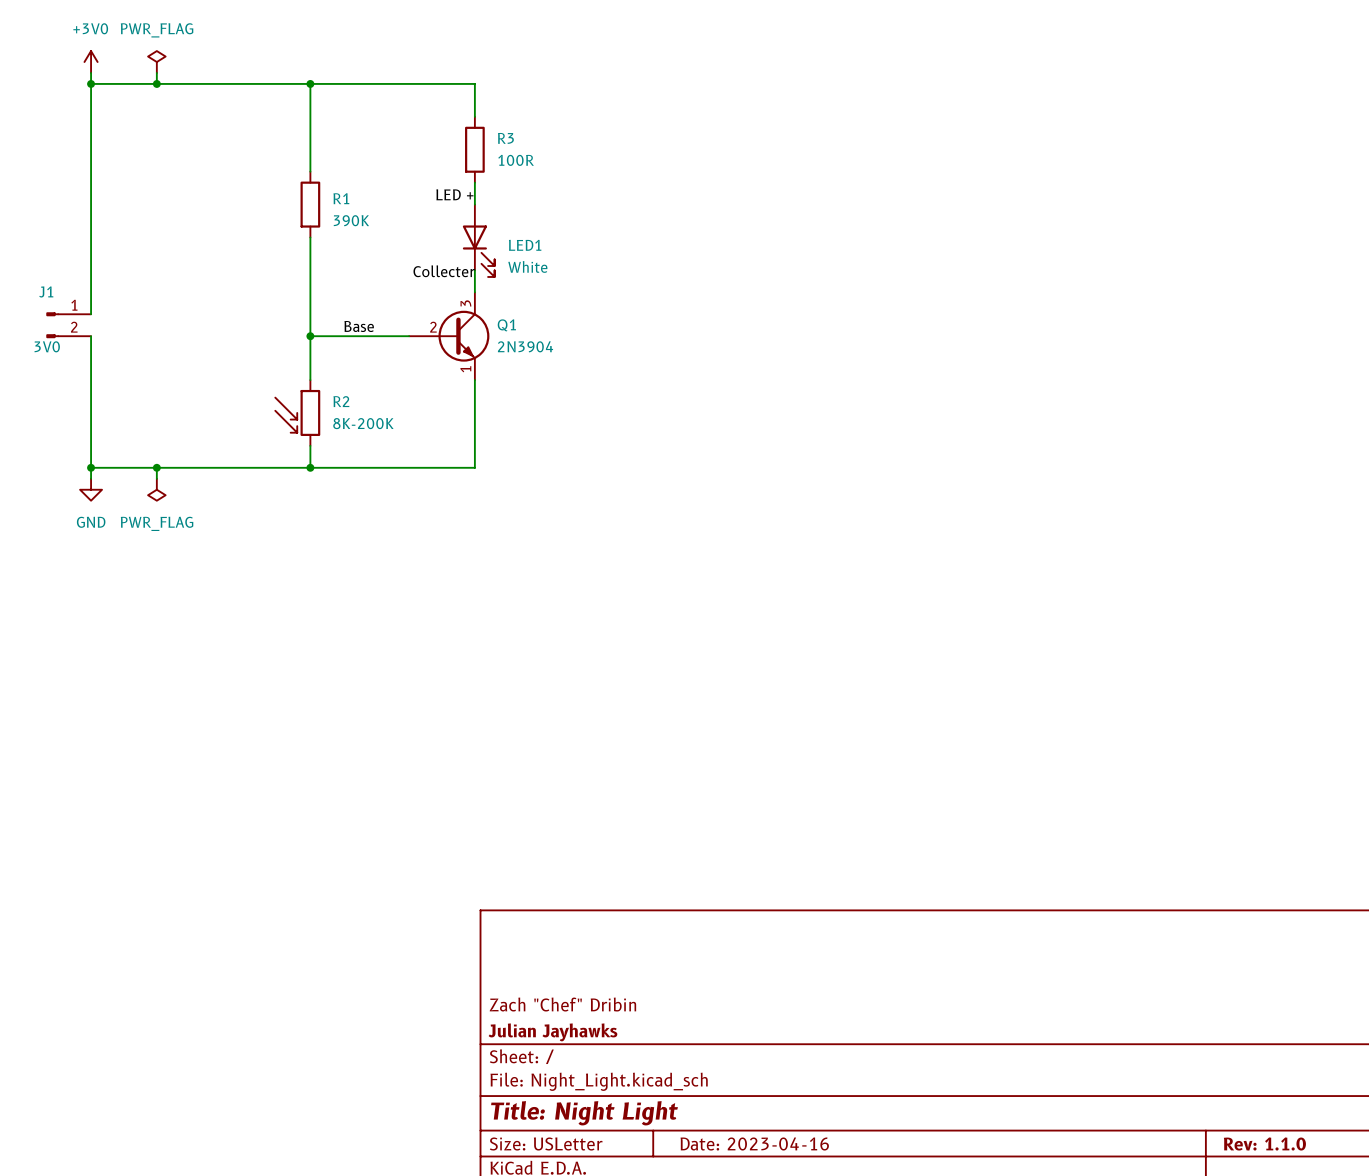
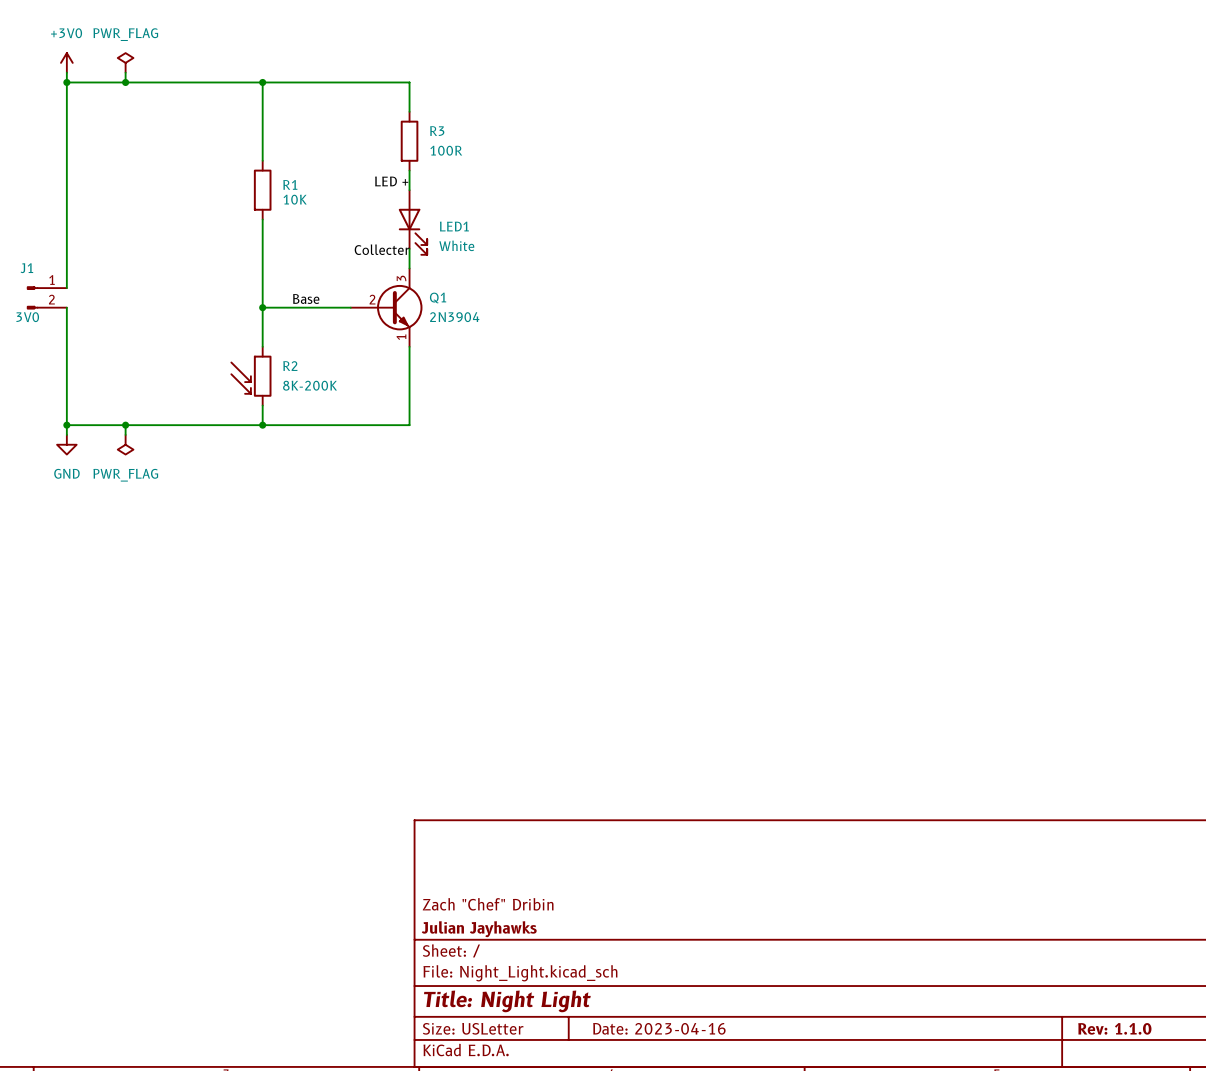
R1 value: 390K (351, 220) -> 10K (295, 199)

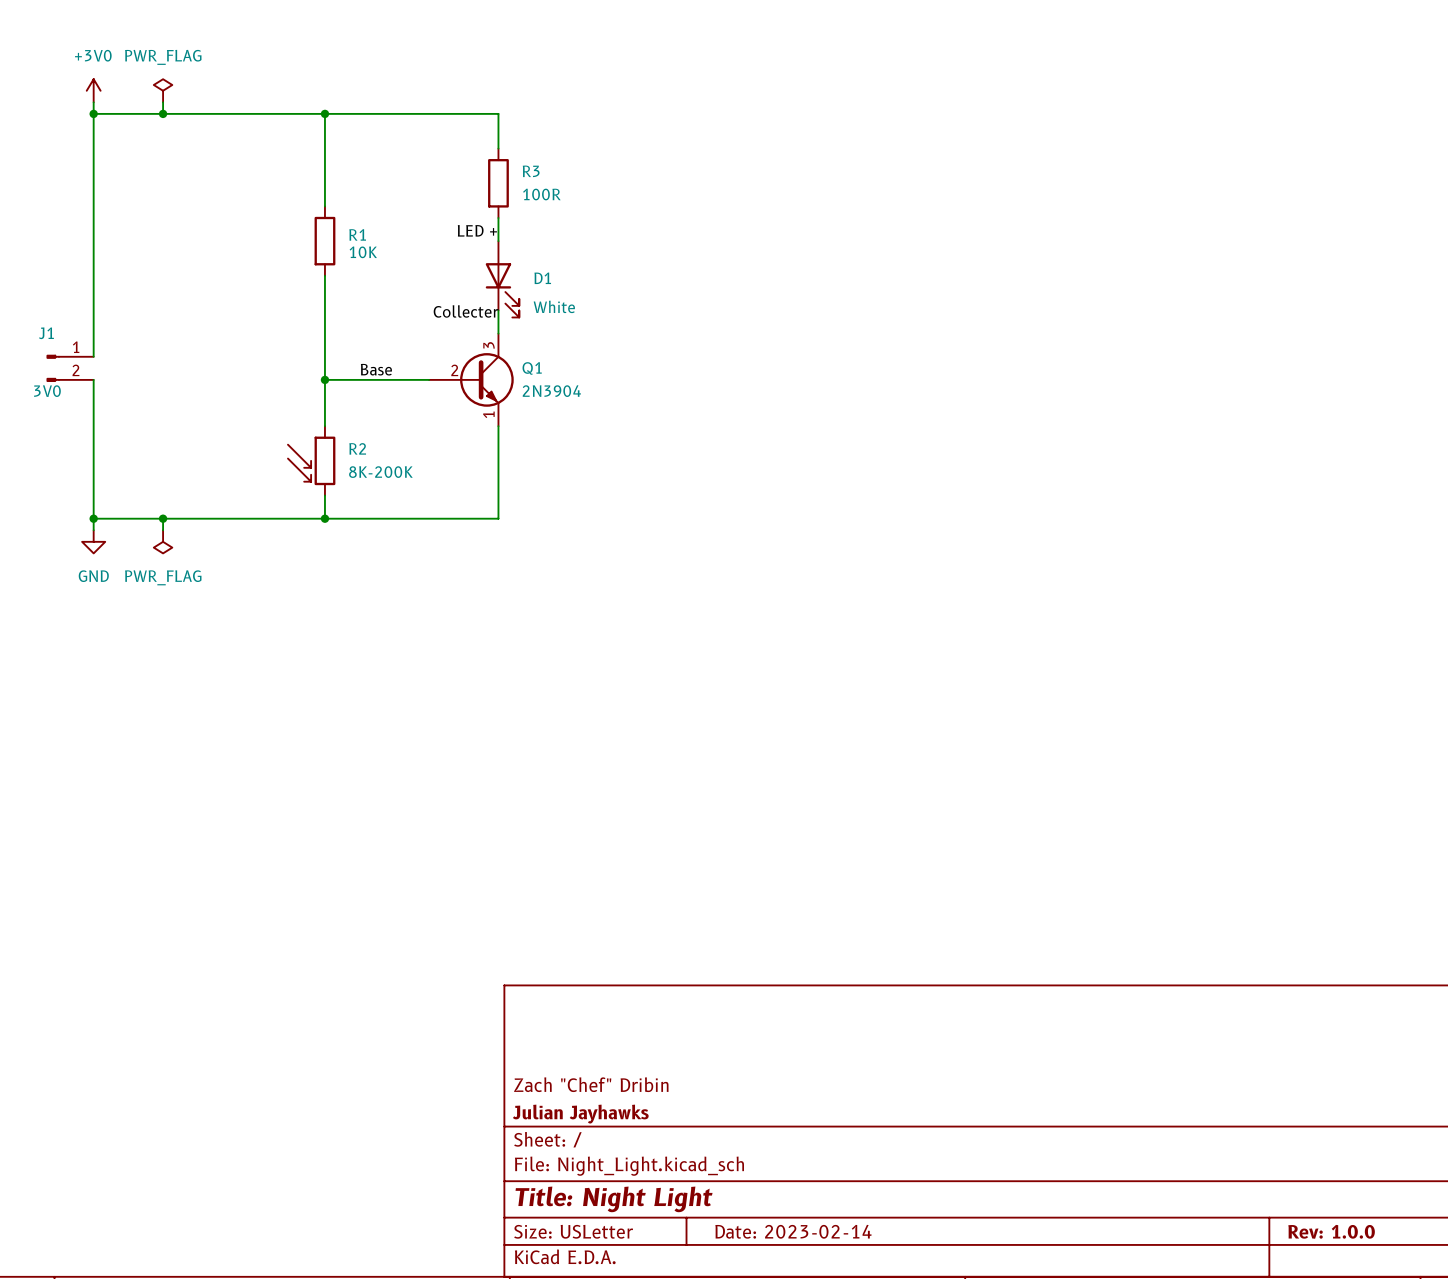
LED1 name: LED1 (454, 226) -> D1 (542, 278)
title block: Date: 2023-04-16 (659, 1028) -> Date: 2023-02-14 (793, 1231)
title block: Rev: 1.1.0 (1114, 1028) -> Rev: 1.0.0 (1331, 1231)

